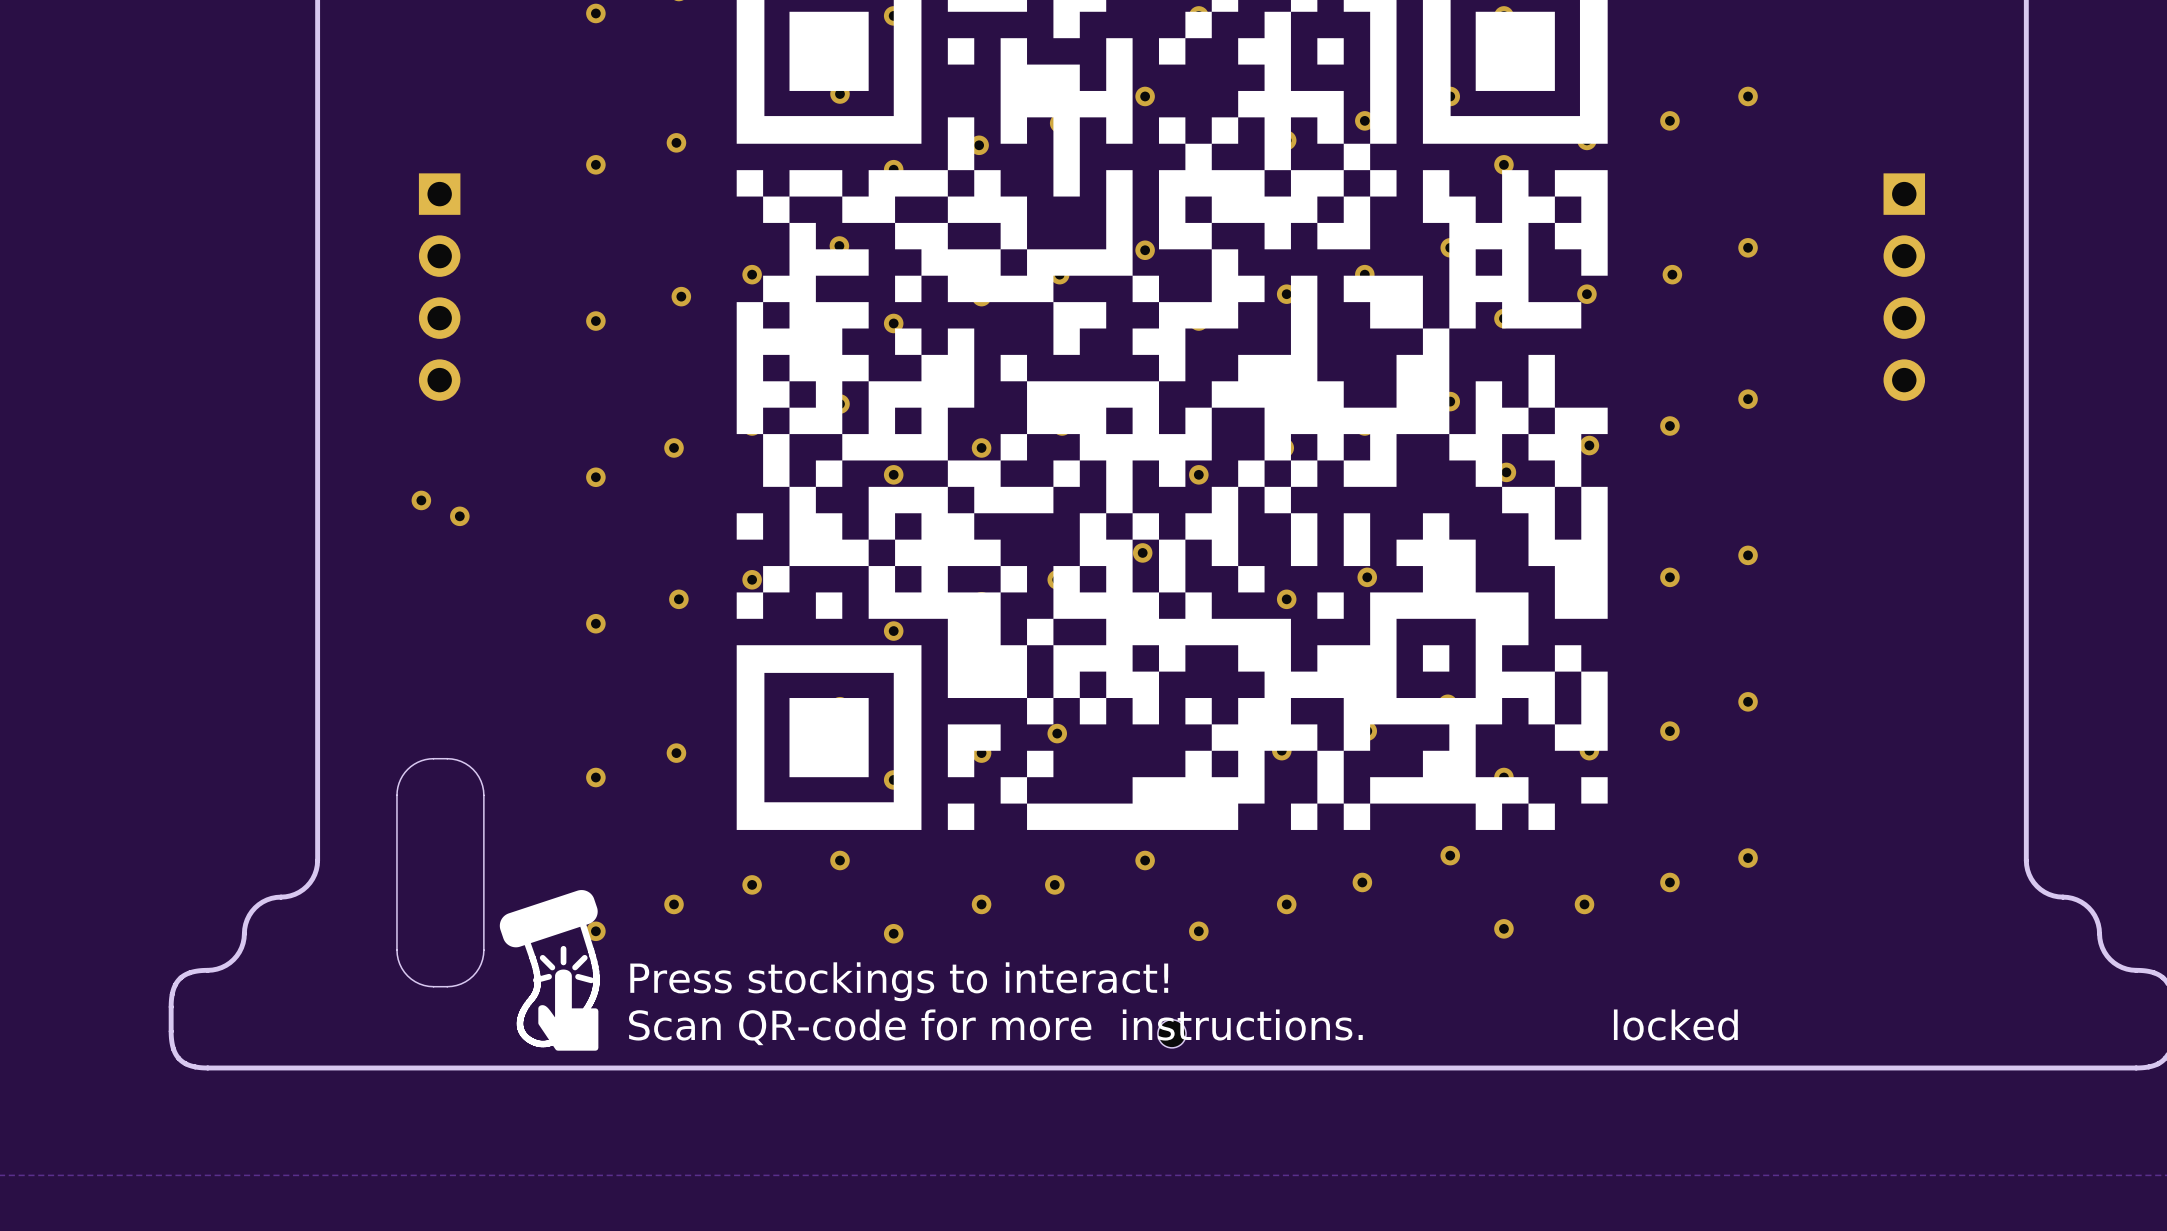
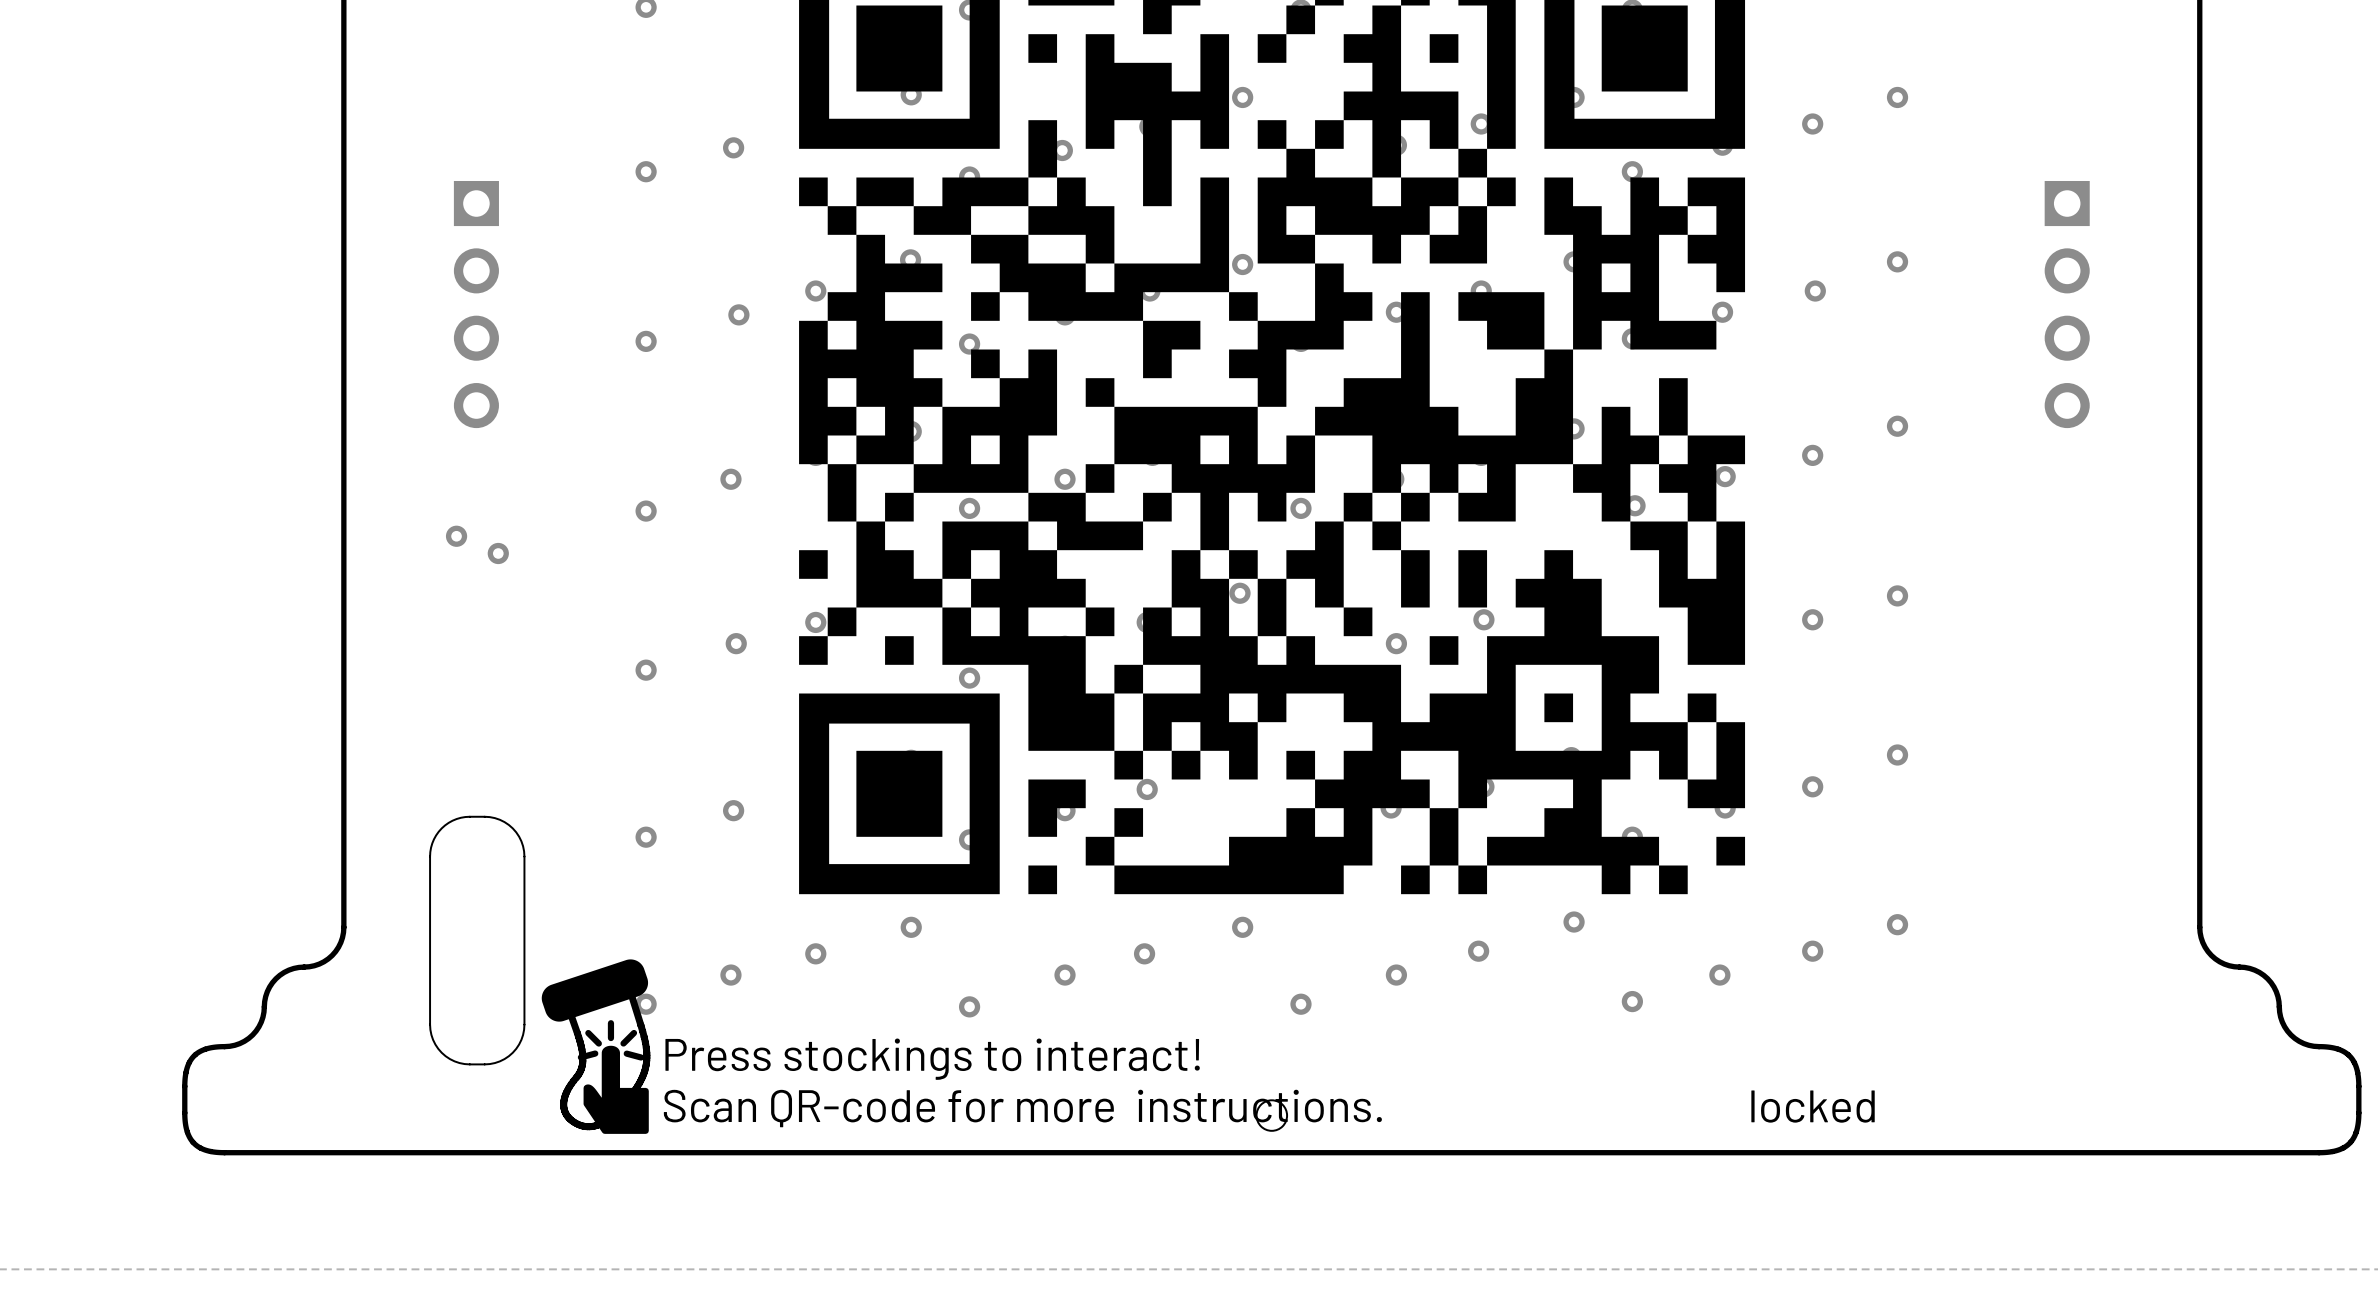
text position: Press stockings to interact! (899, 981) -> Press stockings to interact! (932, 1059)
text position: Scan QR-code for more instructions. (995, 1027) -> Scan QR-code for more instructions. (1022, 1108)

